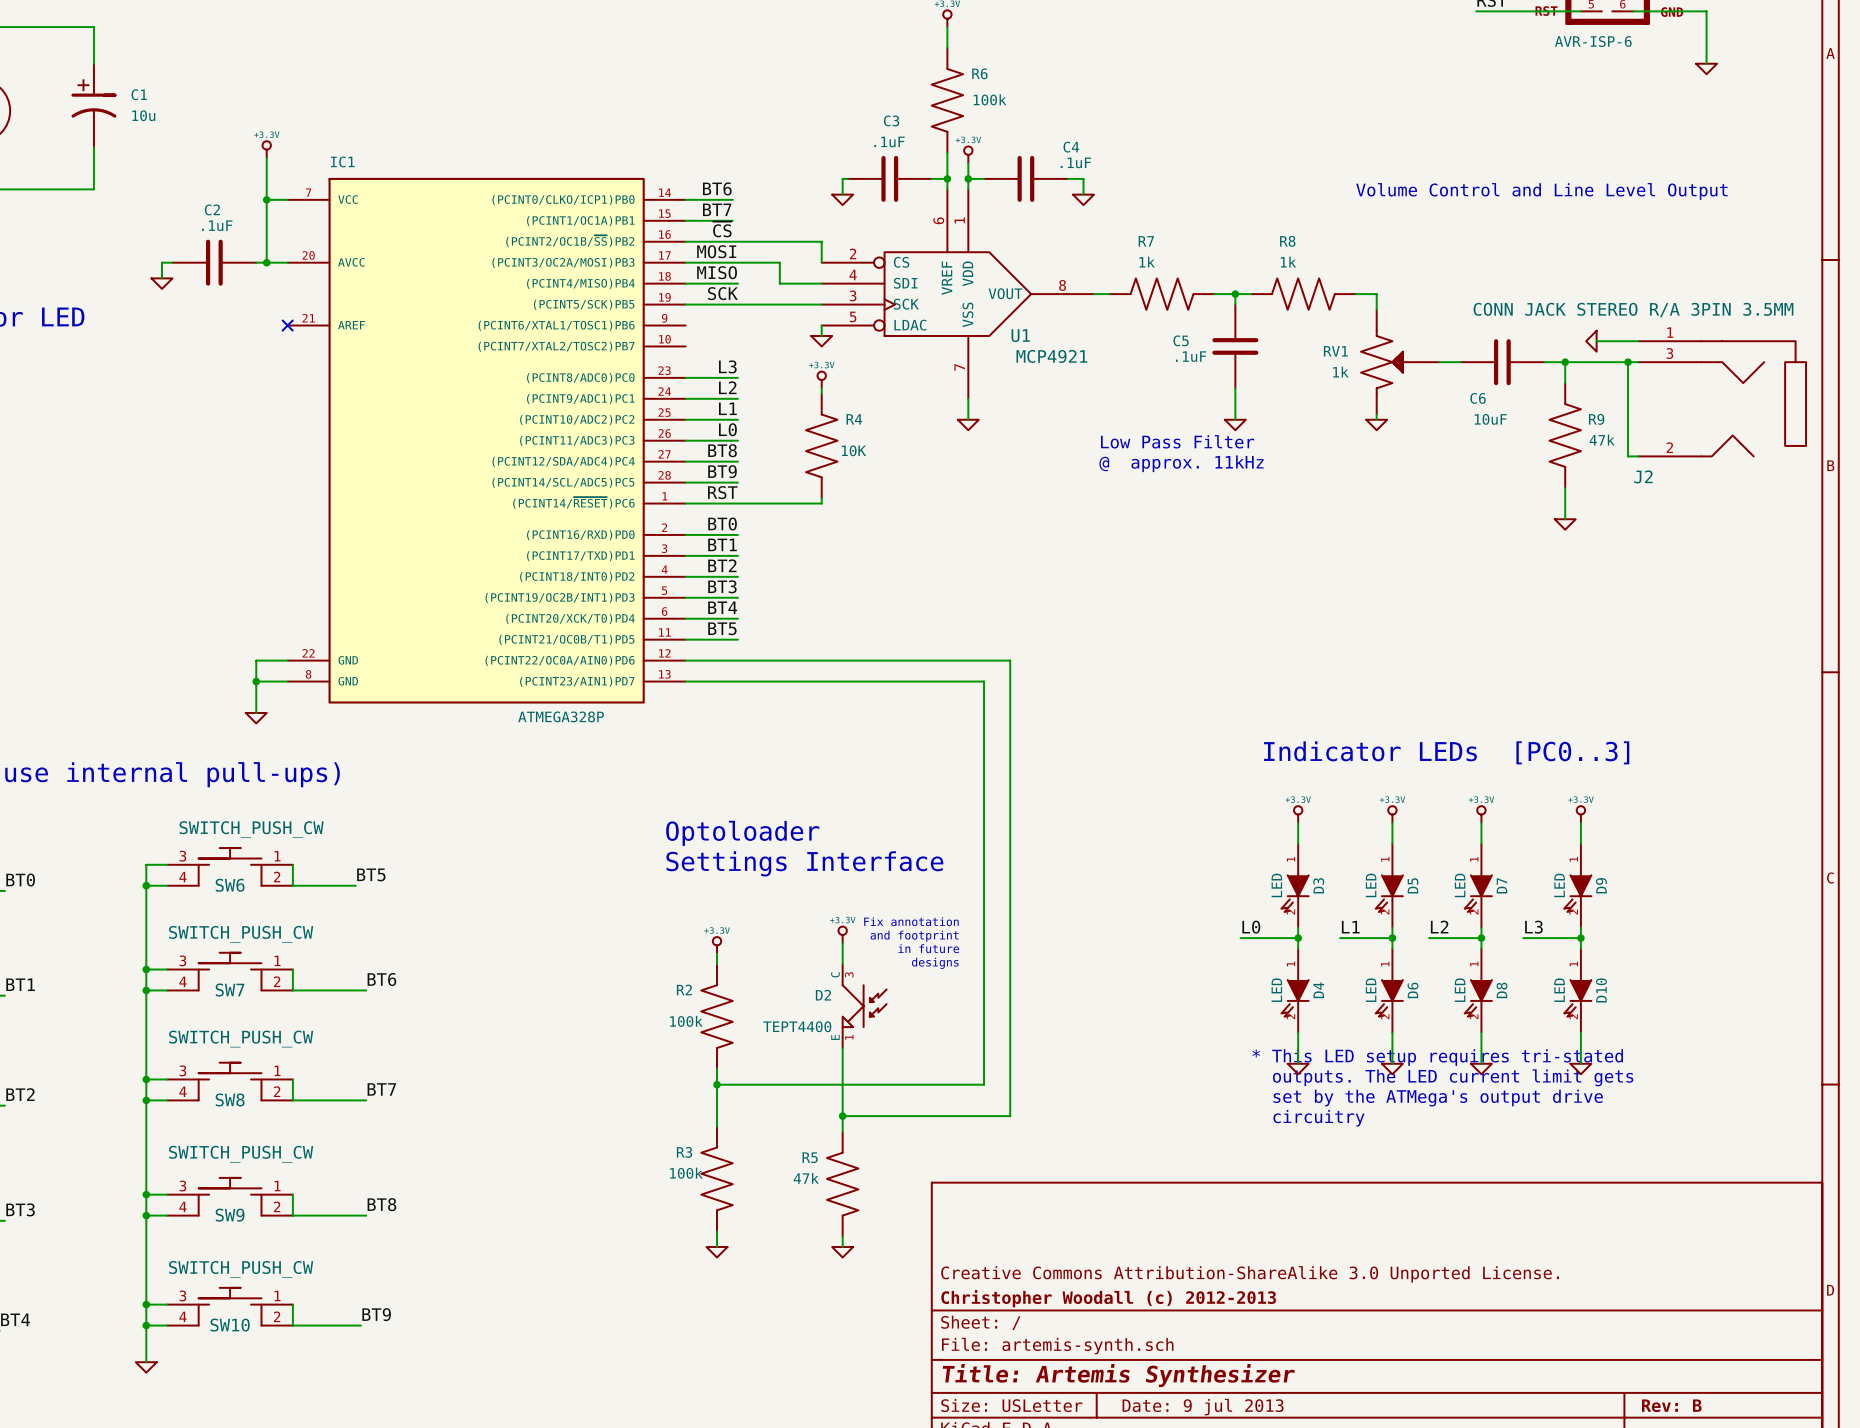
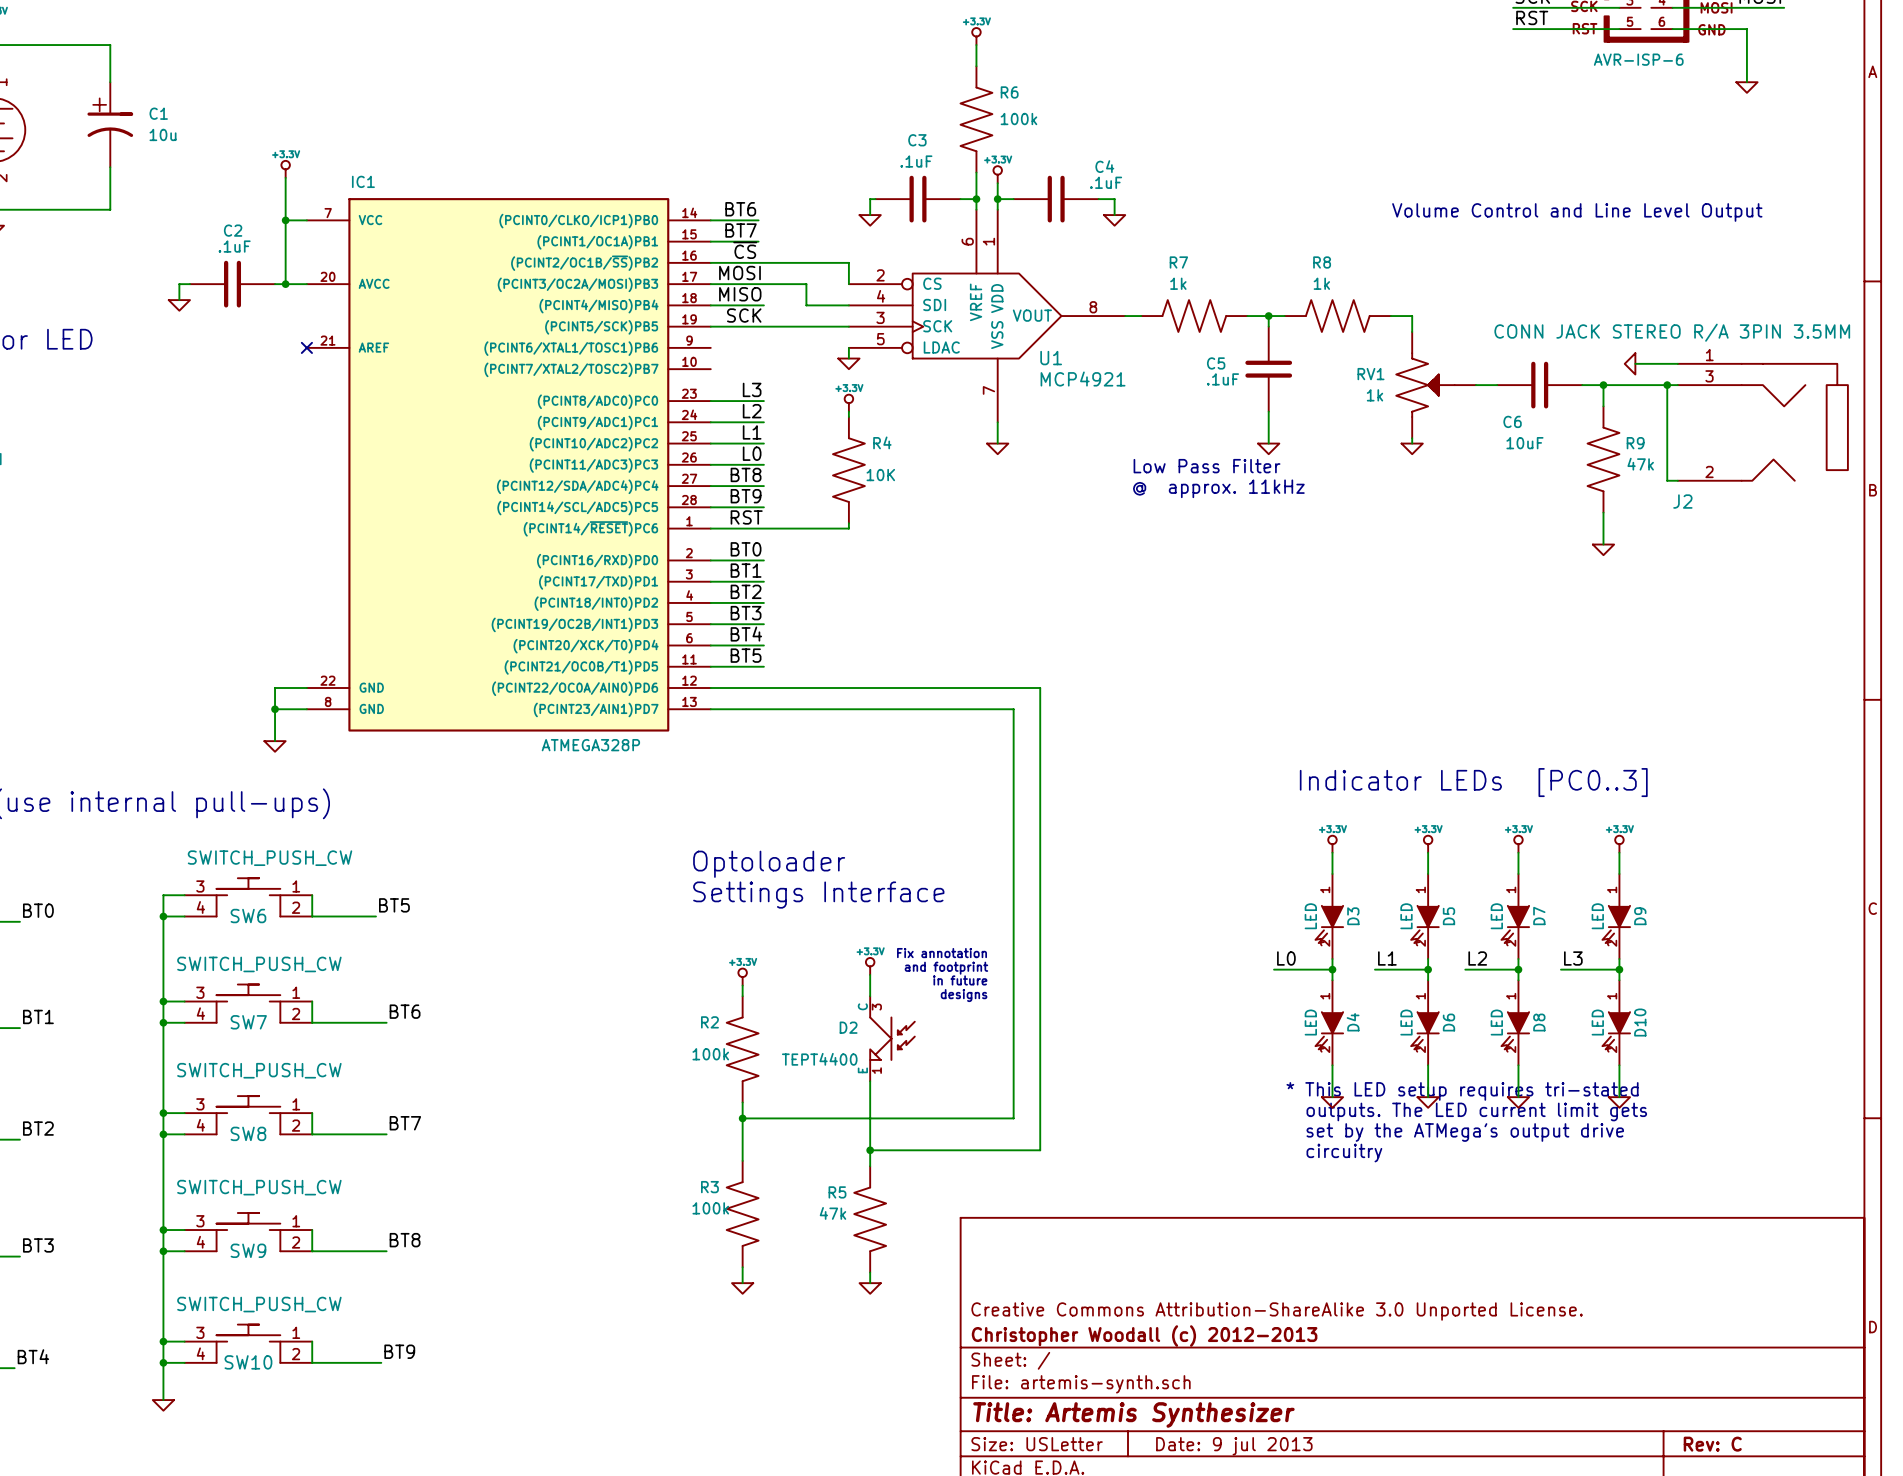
title block: Rev: B (1671, 1405) -> Rev: C (1712, 1444)

